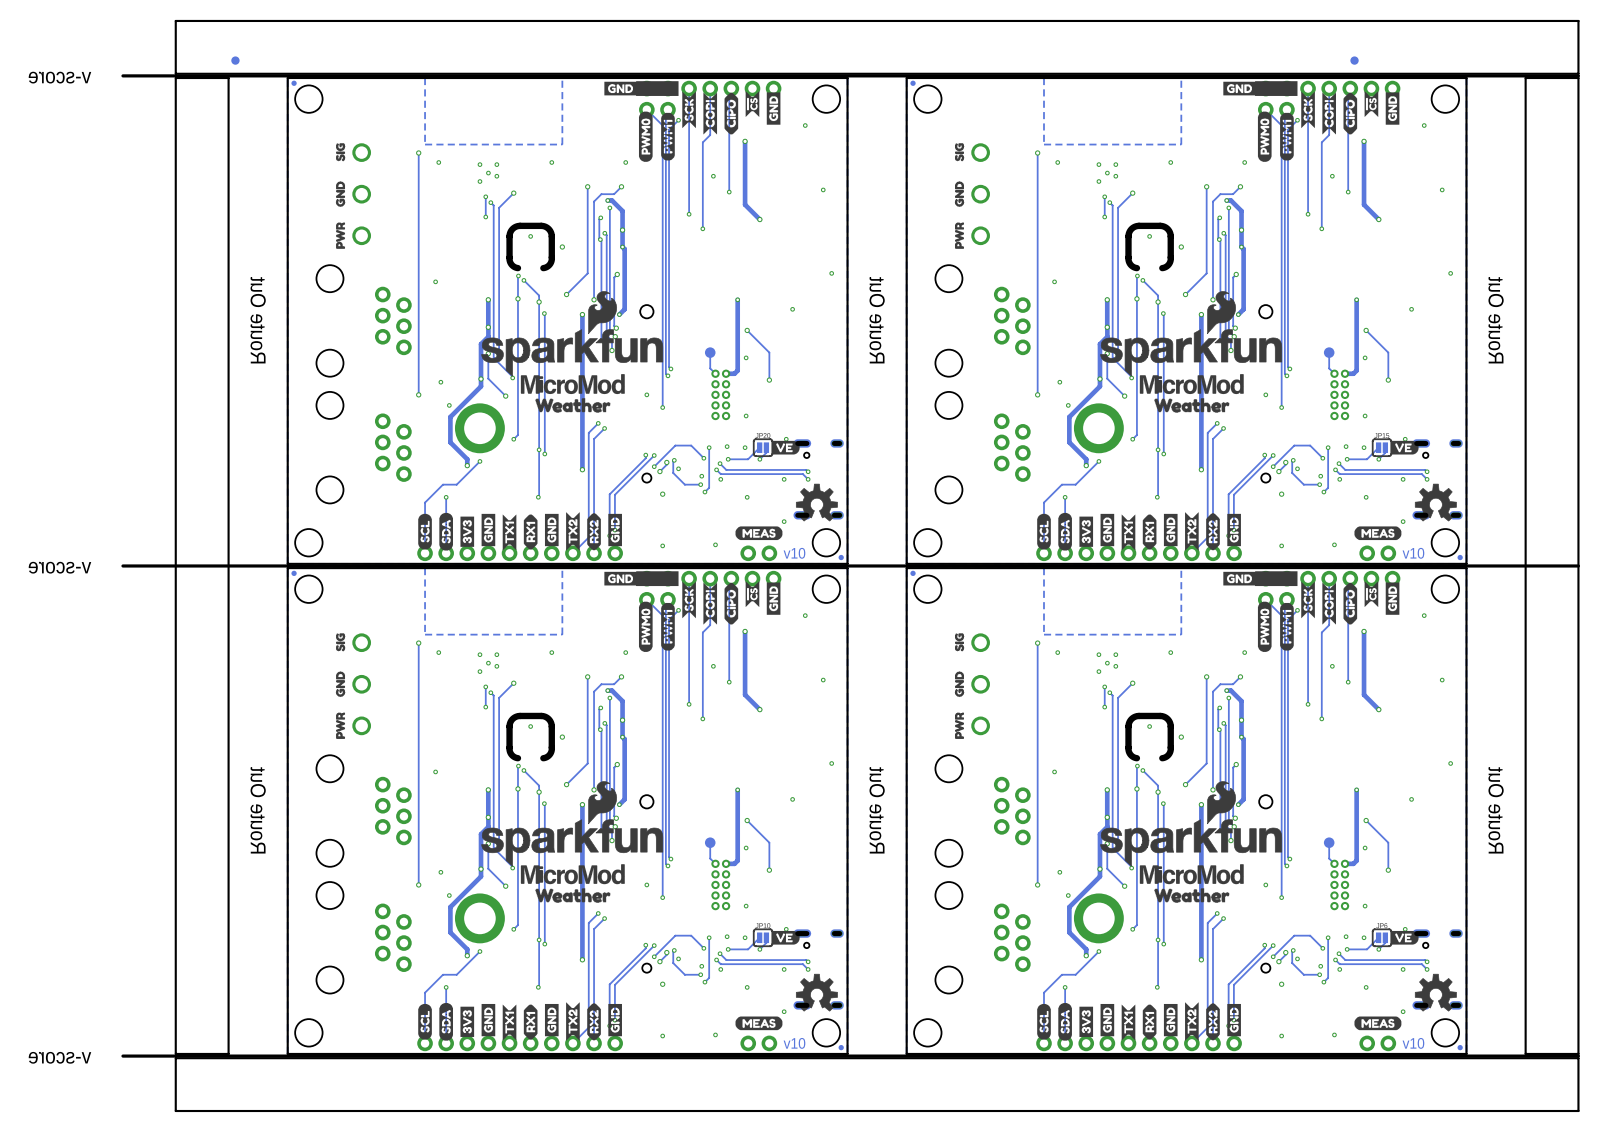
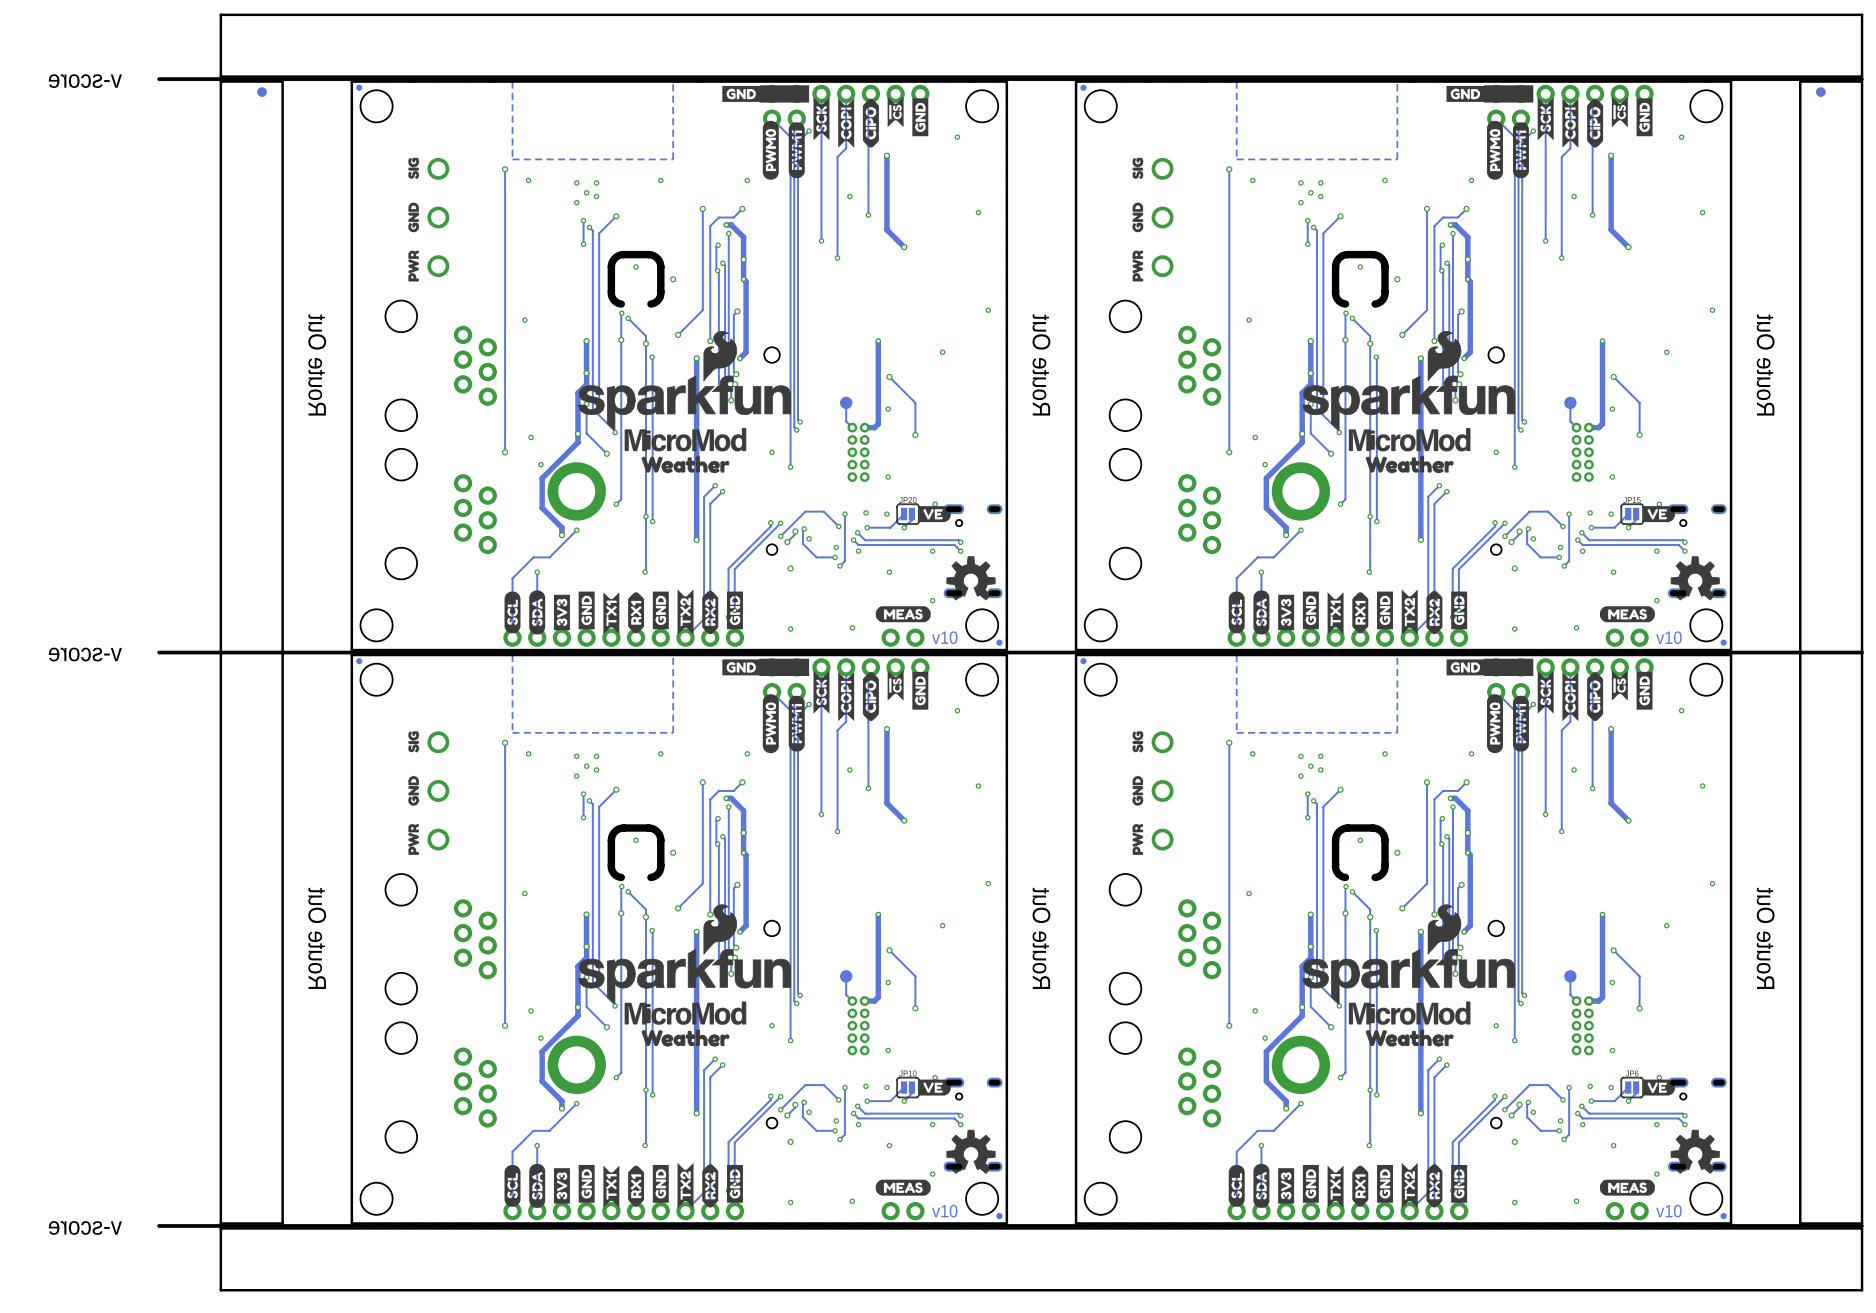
part position: (235, 60) -> (262, 92)
part position: (1354, 60) -> (1820, 92)

